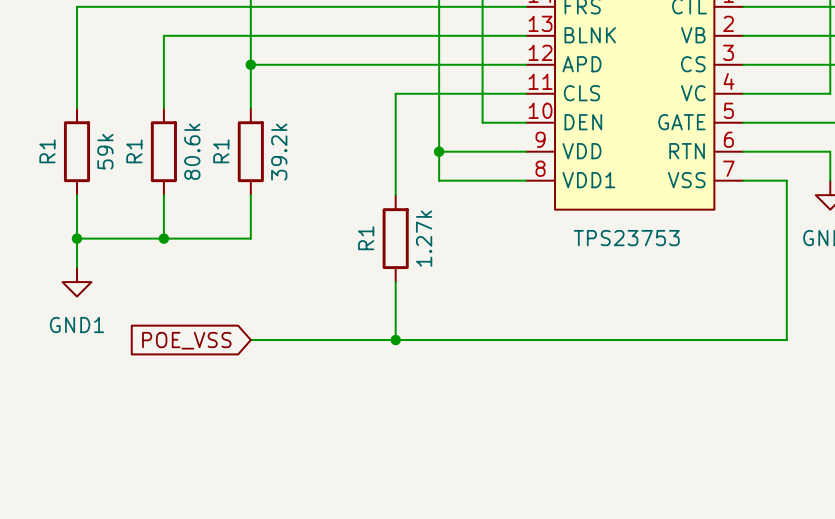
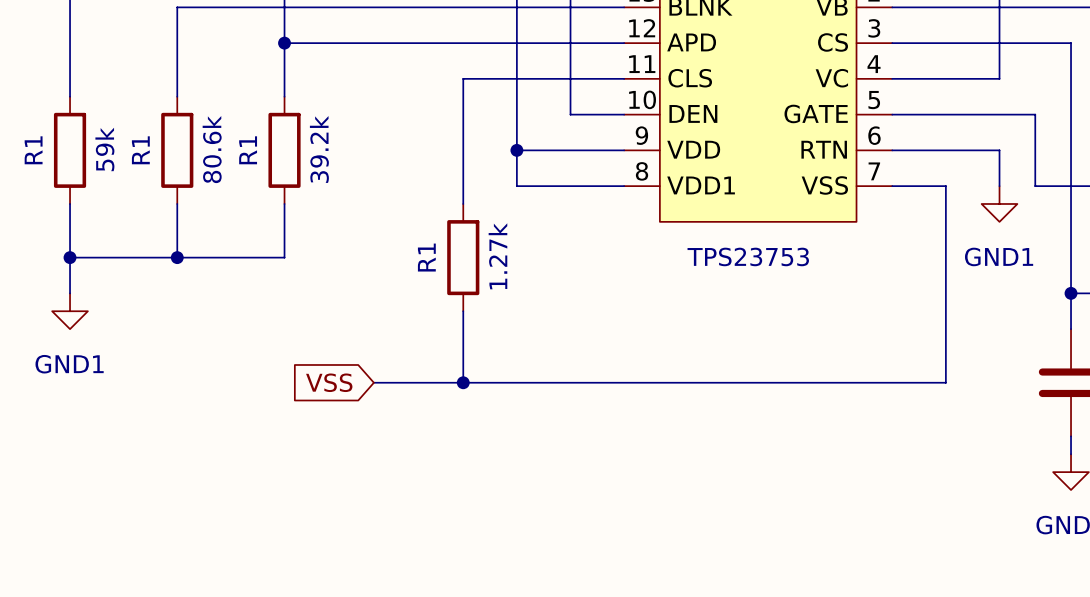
global label: POE_VSS (186, 340) -> none
wire: (250, 340) (323, 340) -> none
global label: none -> VSS (329, 382)

